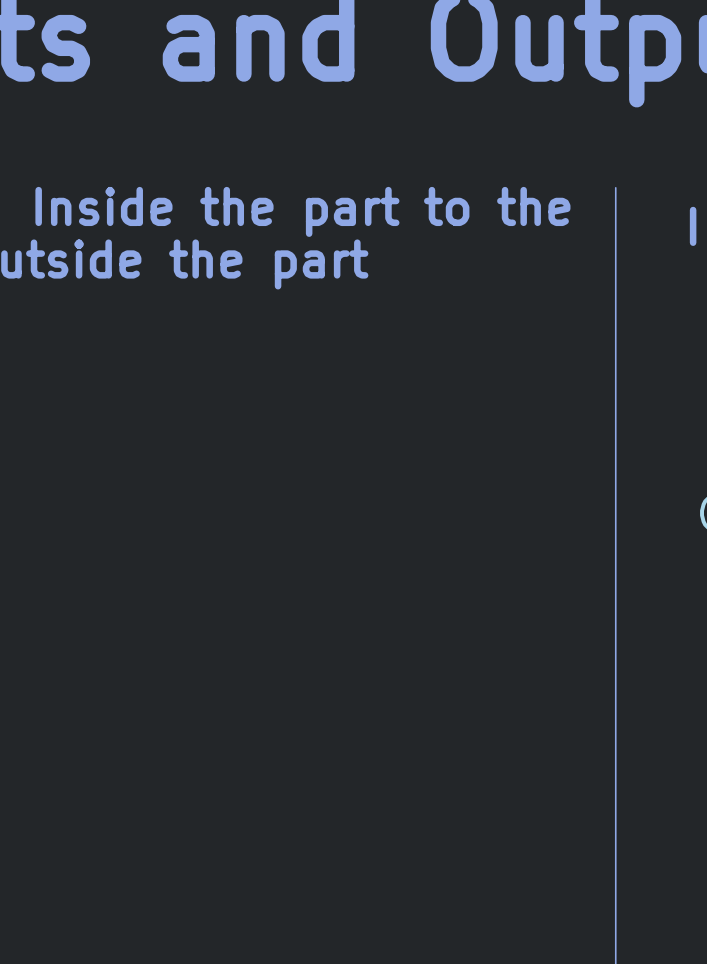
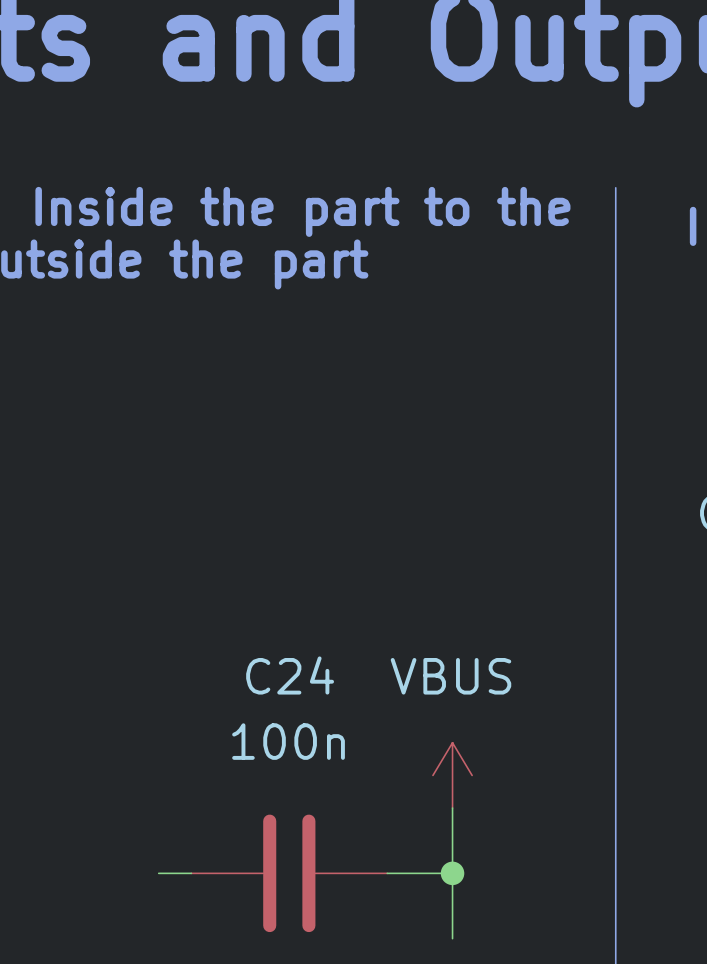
power symbol: none -> VBUS (452, 775)
wire: none -> (452, 808) (452, 938)
wire: none -> (158, 873) (191, 873)
C24: none -> 100n (289, 873)
wire: none -> (387, 873) (452, 873)
junction: none -> (452, 873)

